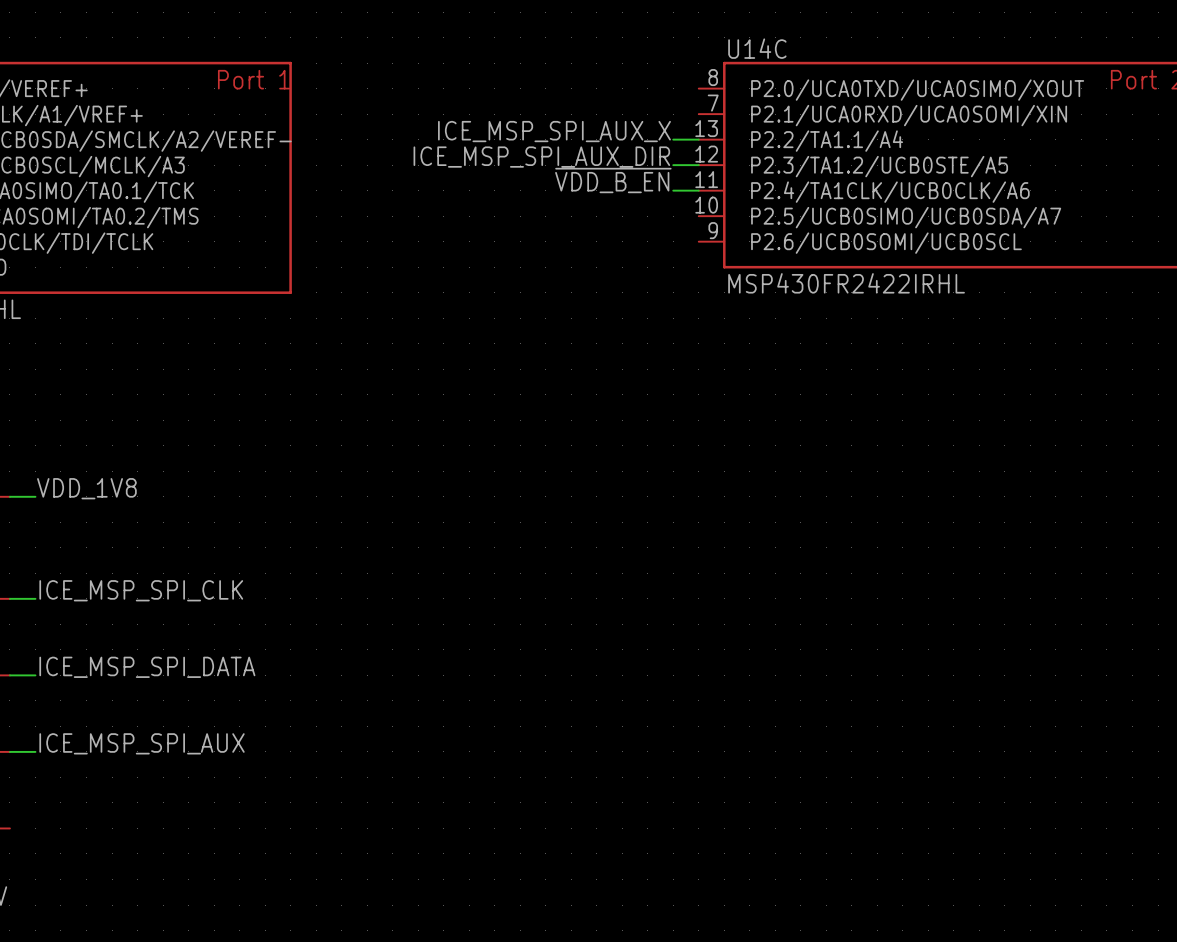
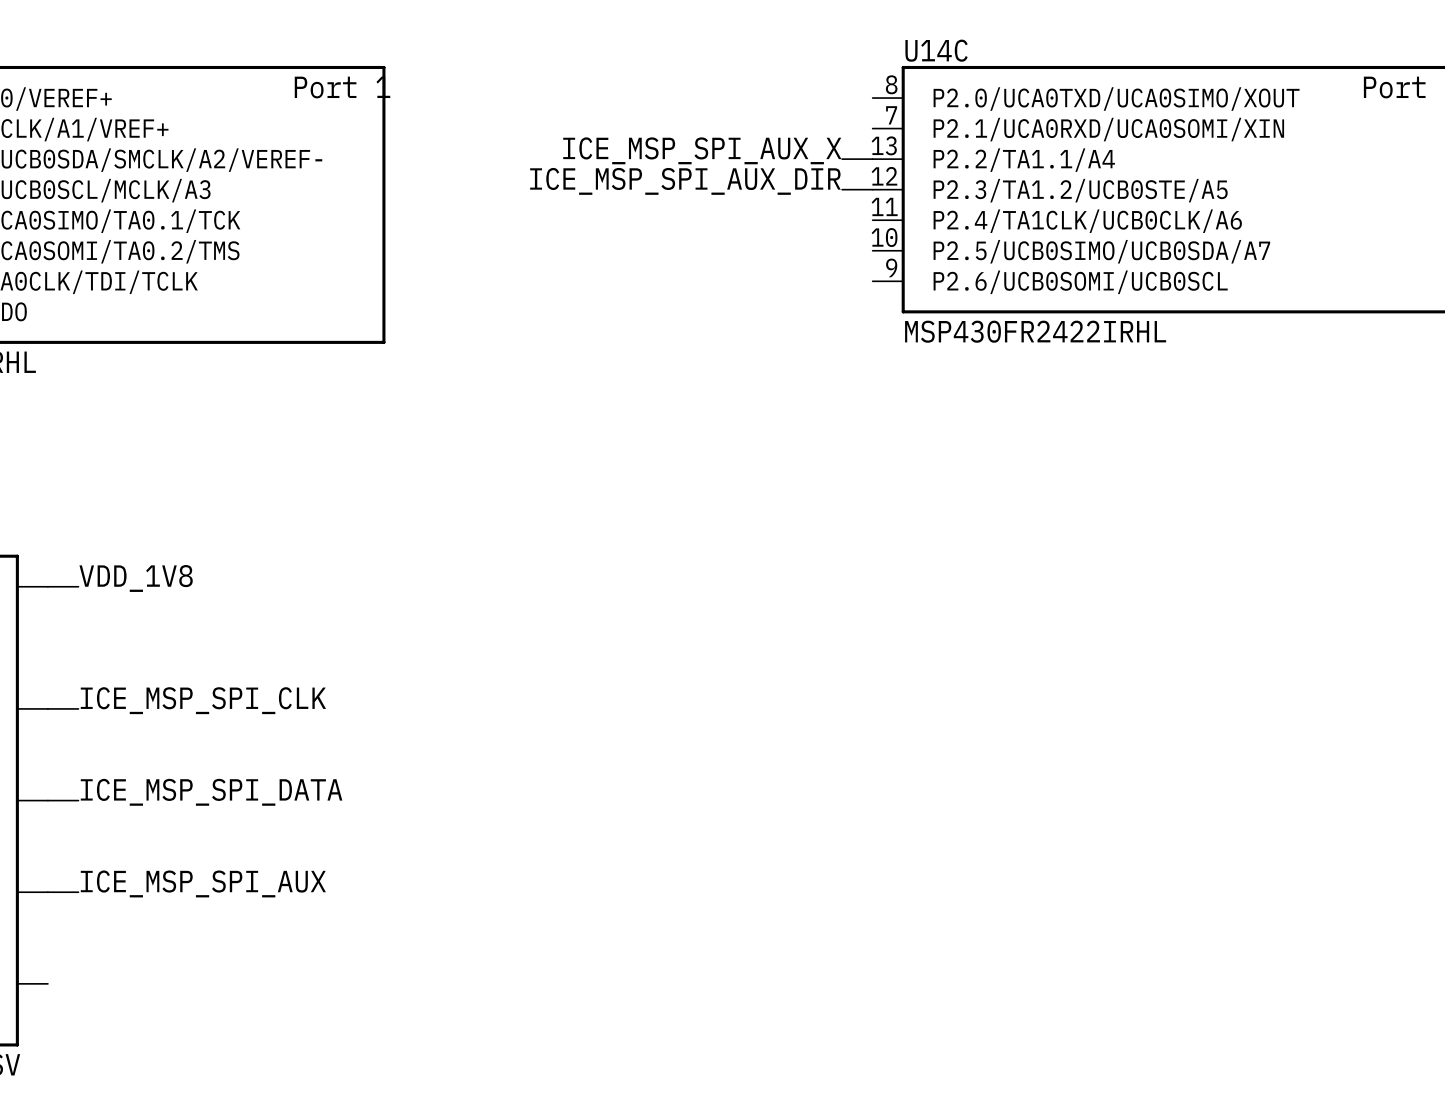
label: ~{VDD_B_EN} (613, 180) -> none
wire: (673, 190) (698, 190) -> none

